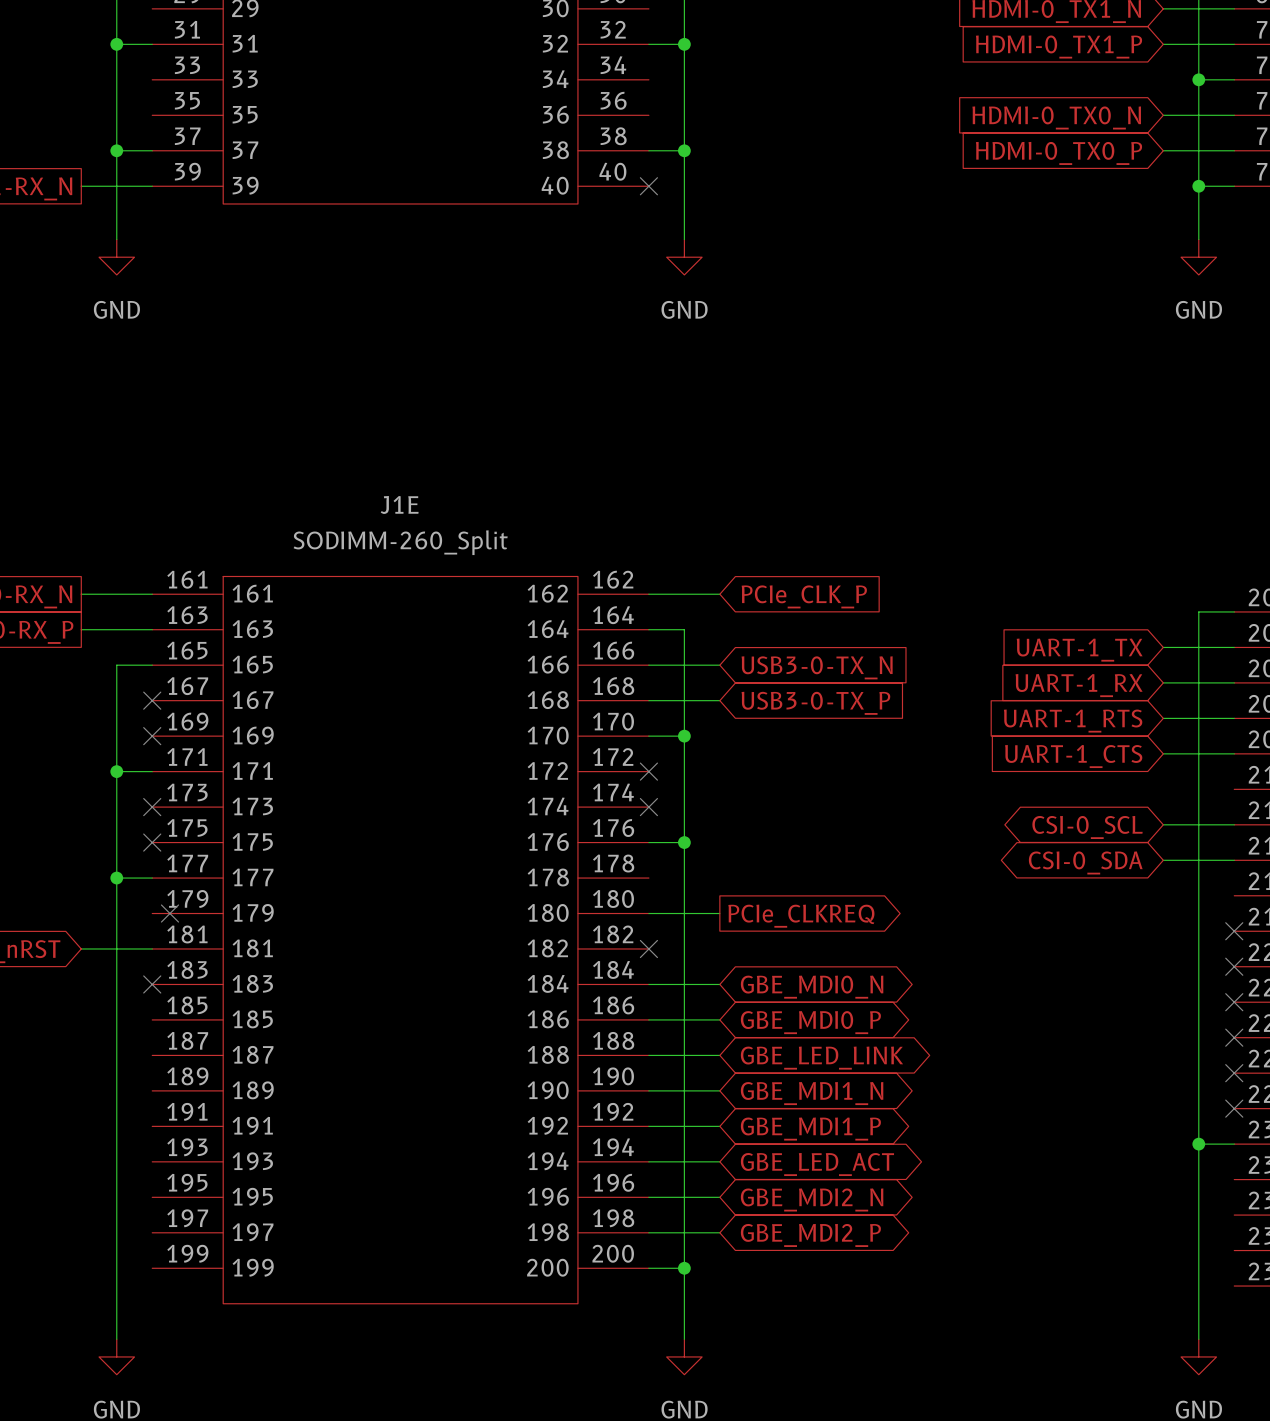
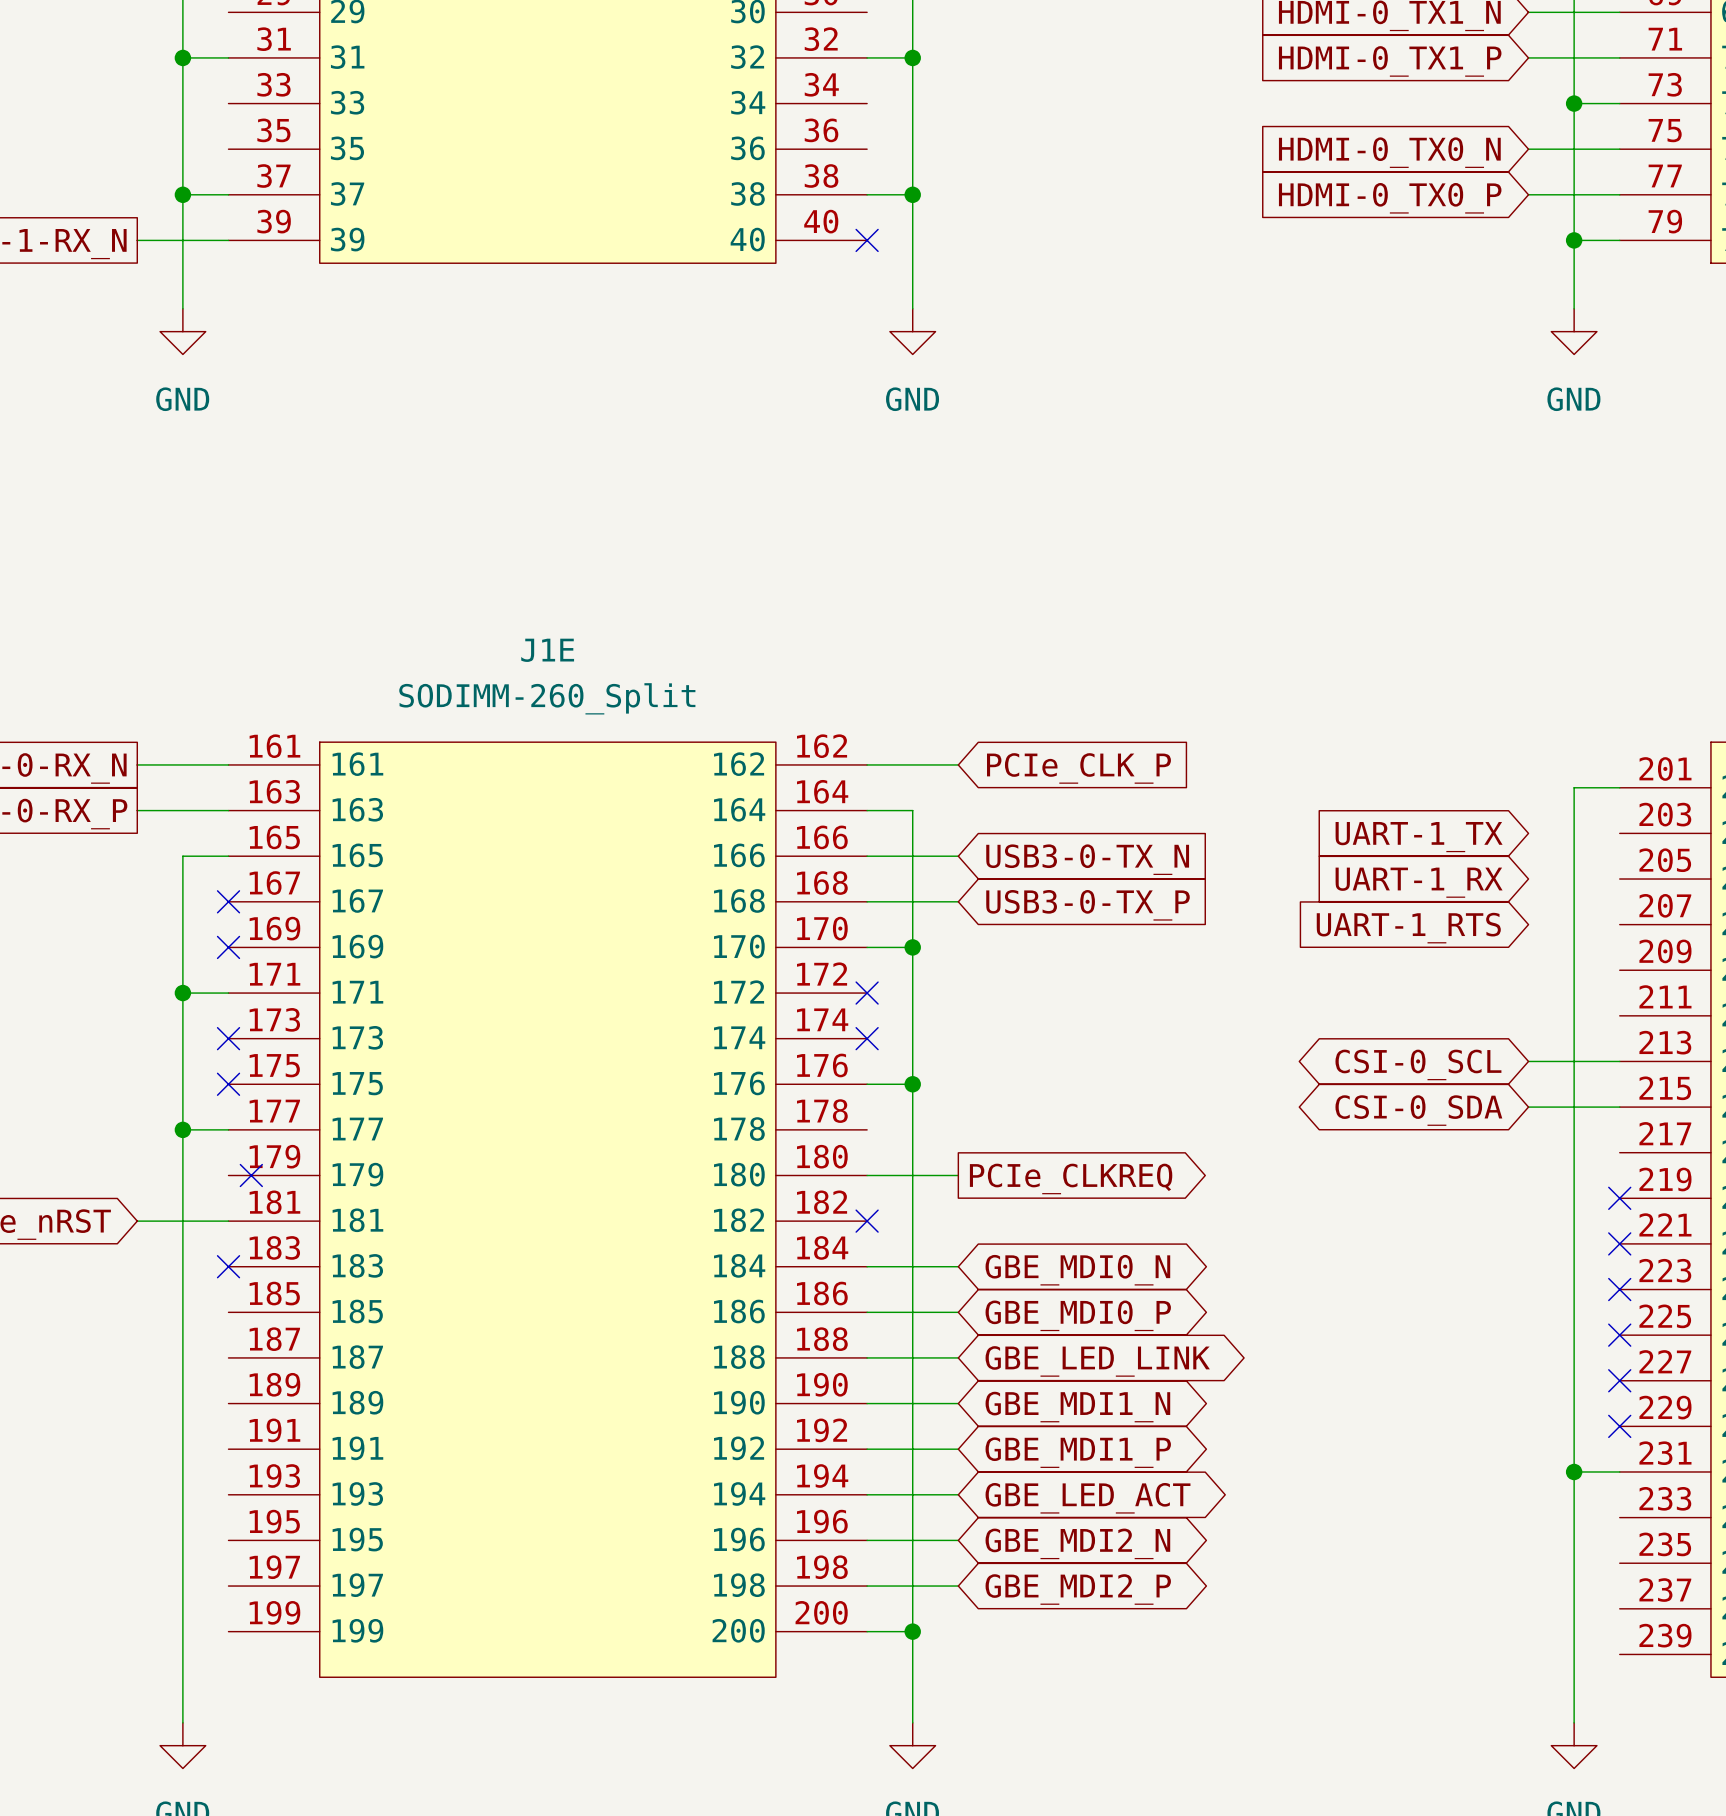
wire: (1163, 647) (1234, 647) -> none
wire: (1163, 682) (1234, 682) -> none
wire: (1163, 718) (1234, 718) -> none
wire: (1163, 753) (1234, 753) -> none
global label: UART-1_CTS (1073, 756) -> none

